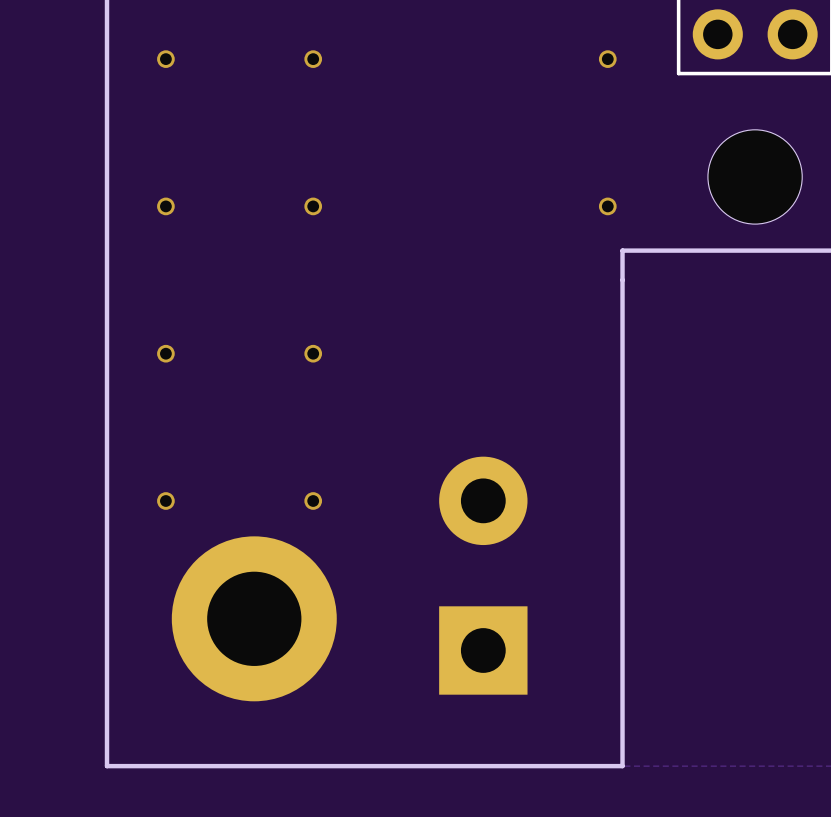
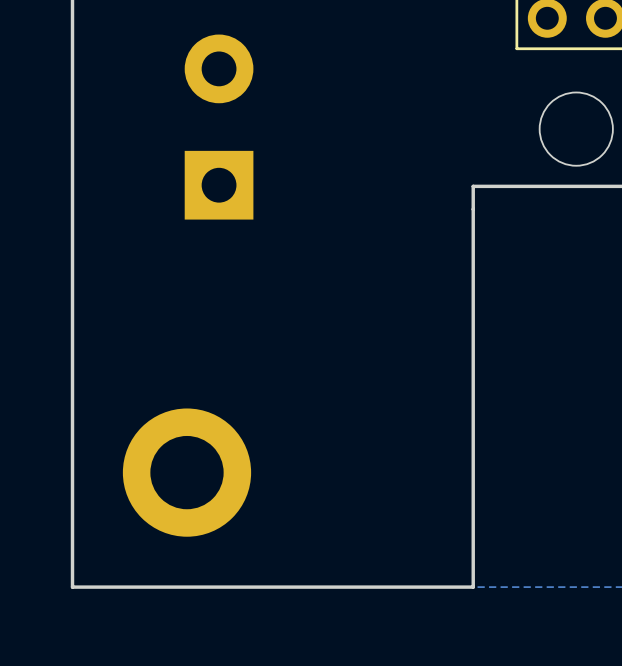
via: (165, 59) -> none
via: (313, 59) -> none
via: (607, 59) -> none
via: (165, 206) -> none
via: (313, 206) -> none
via: (607, 206) -> none
via: (165, 353) -> none
via: (313, 353) -> none
via: (165, 501) -> none
via: (313, 501) -> none
part position: (483, 575) -> (219, 127)

